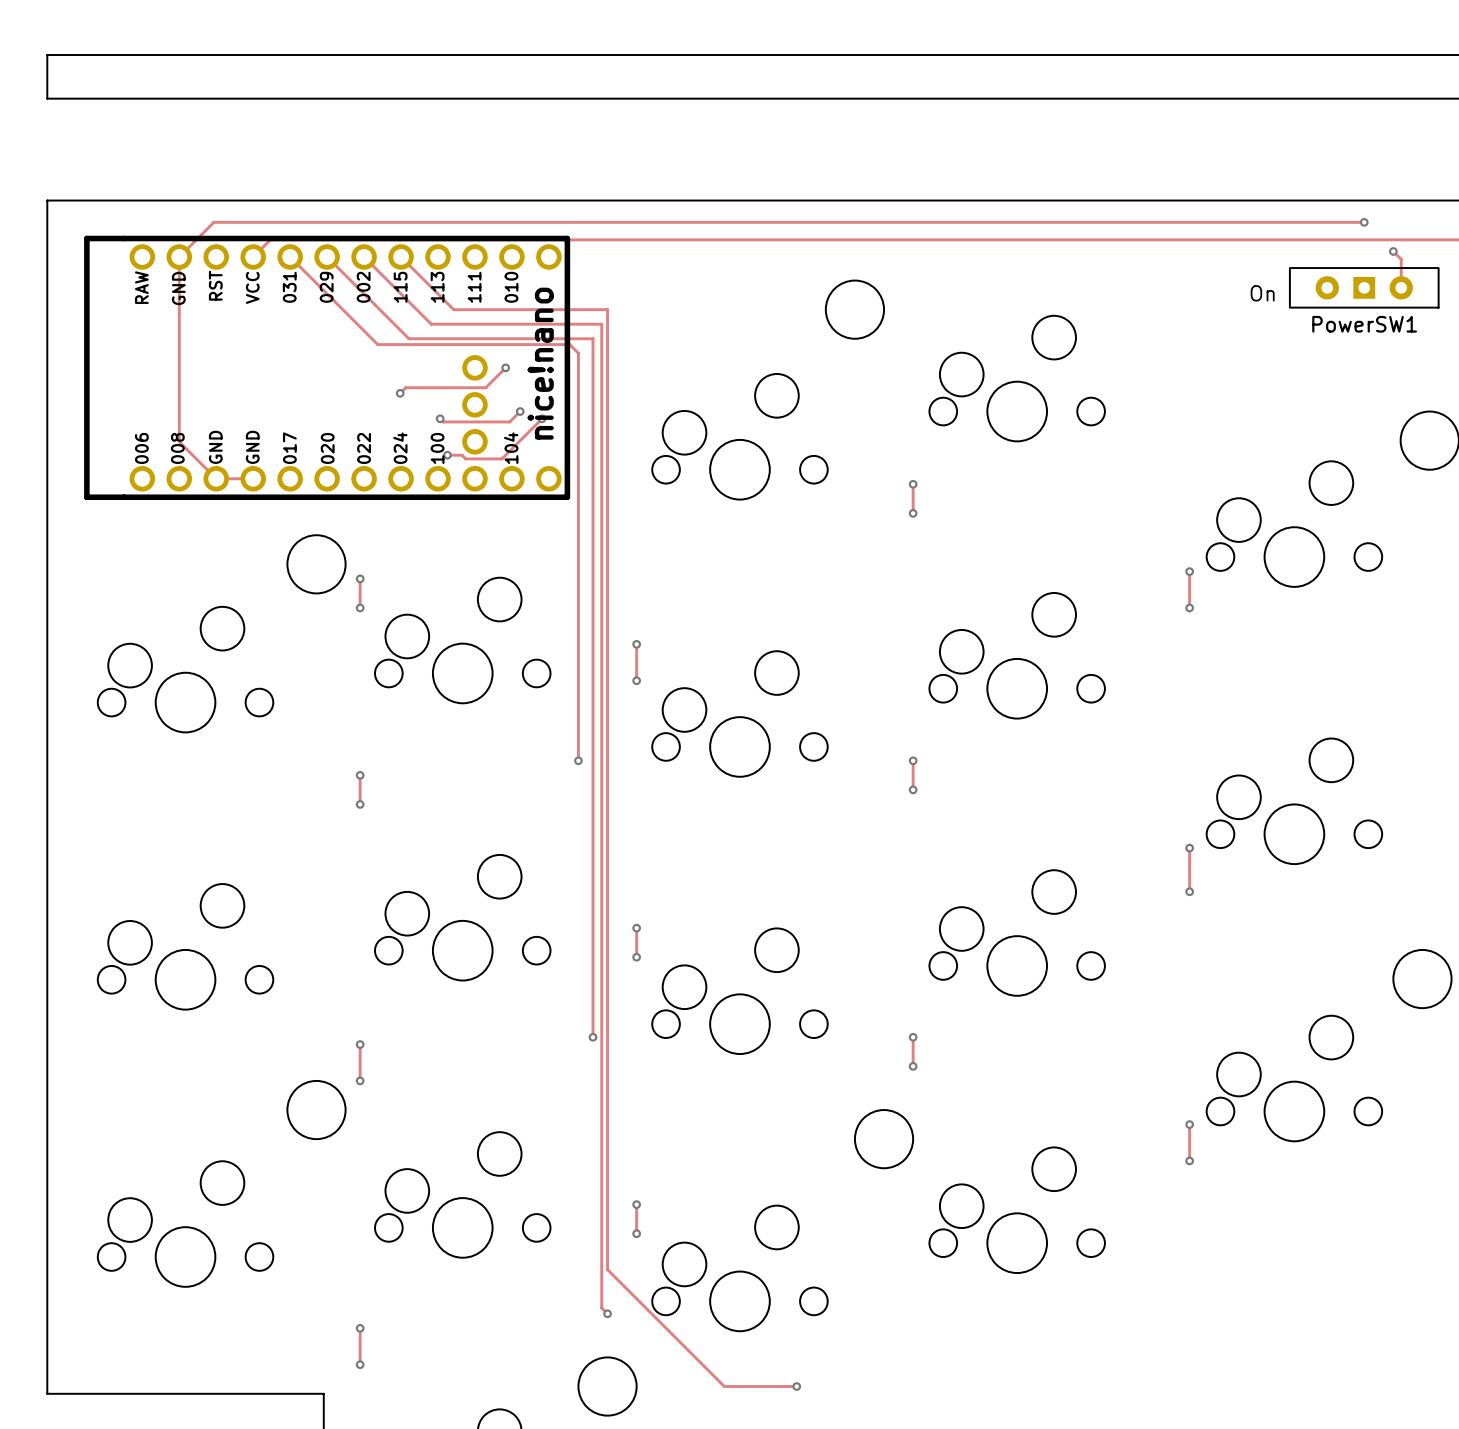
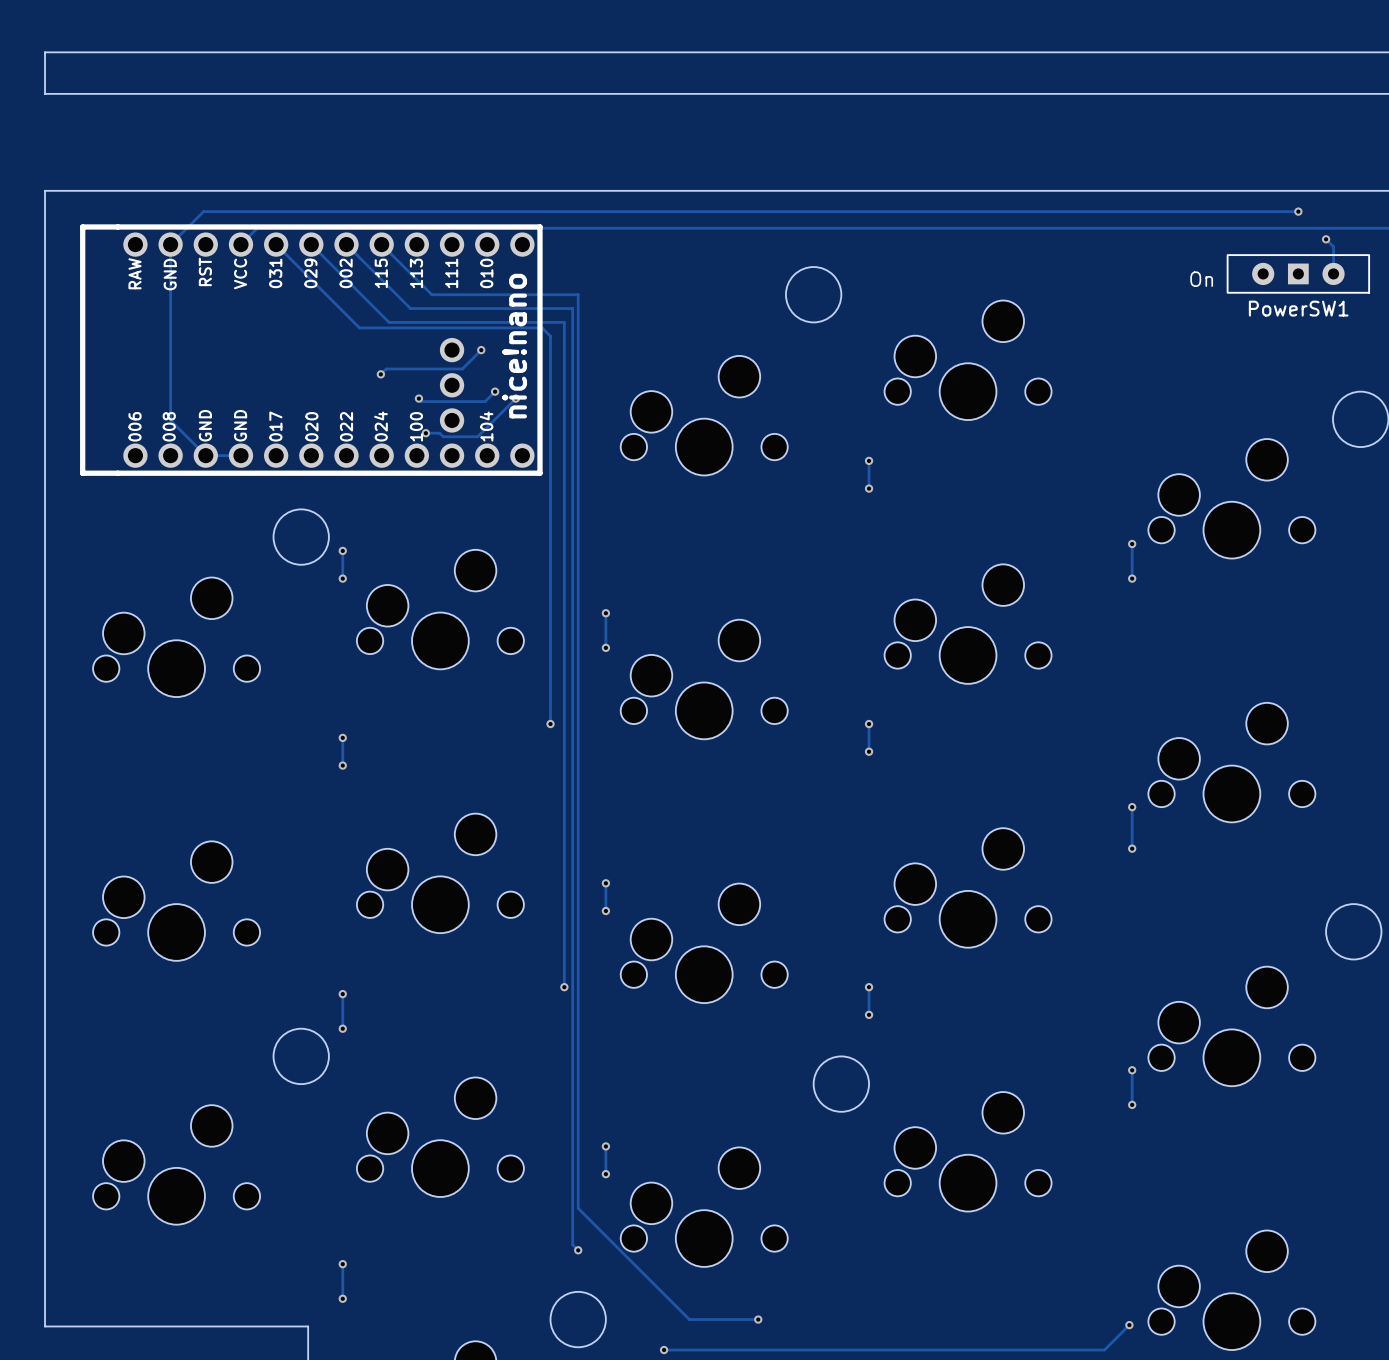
part: none -> (1231, 1290)
track: none -> (1129, 1325) (1104, 1350) (664, 1350)
via: none -> (1129, 1325)
via: none -> (664, 1350)

